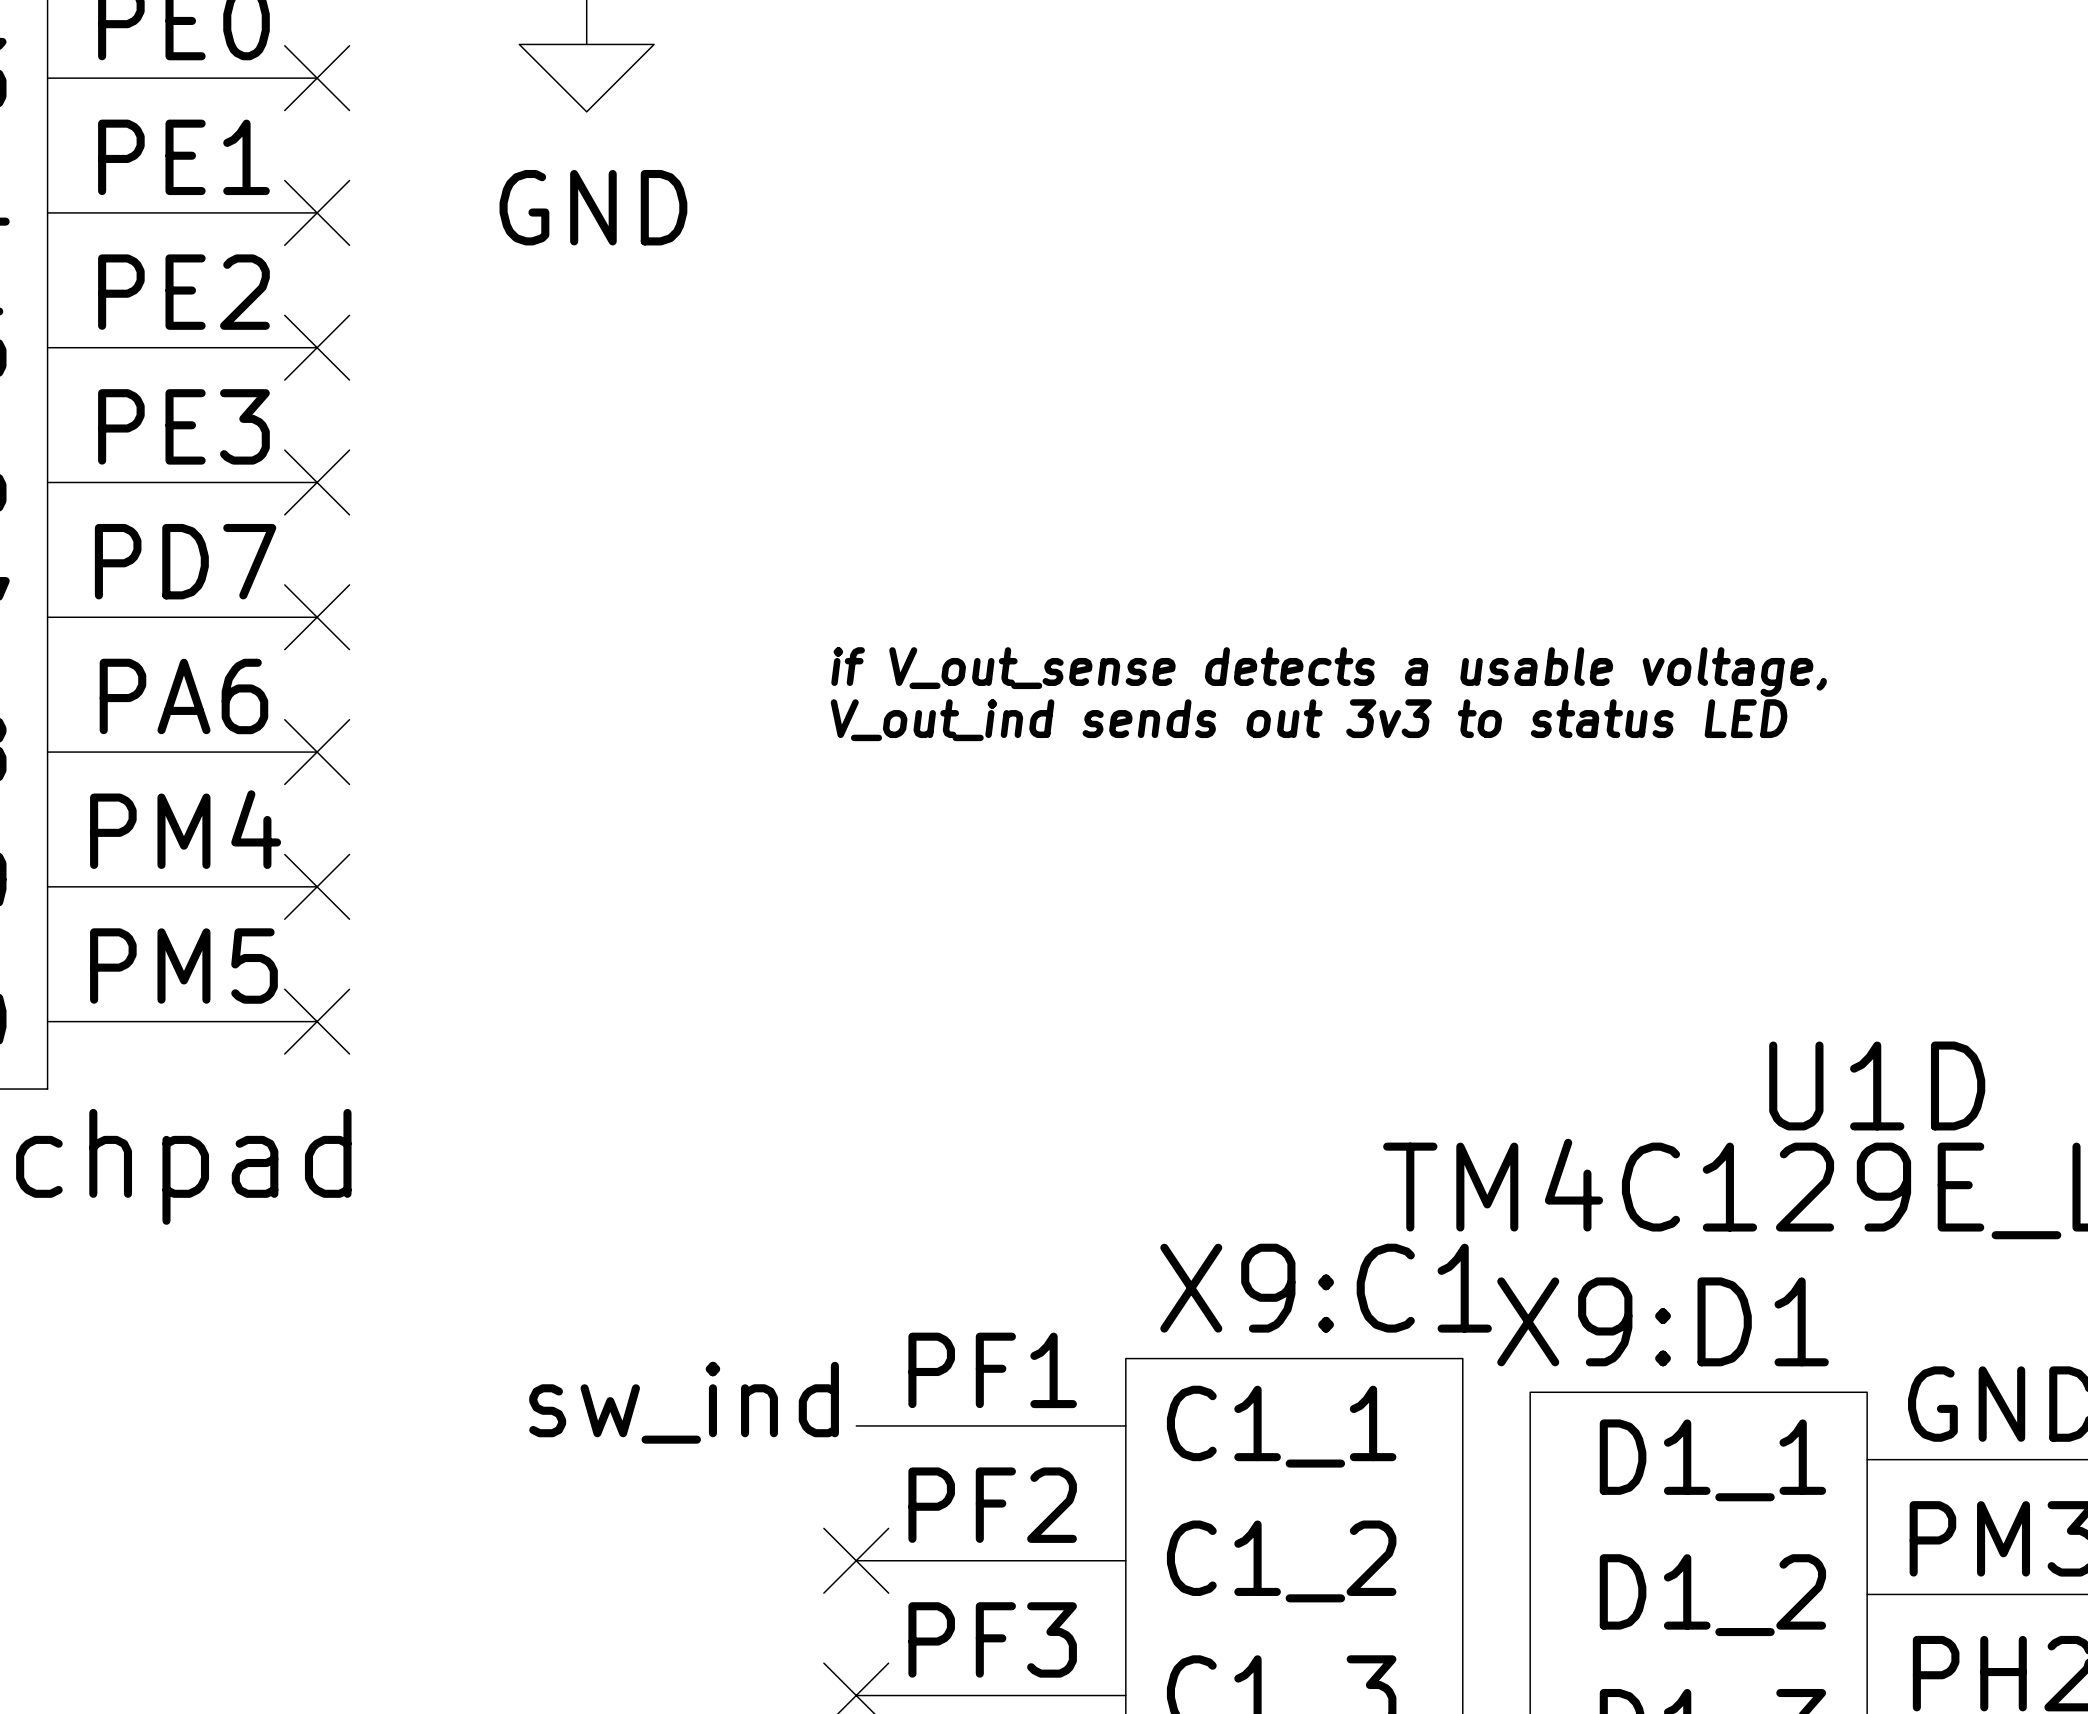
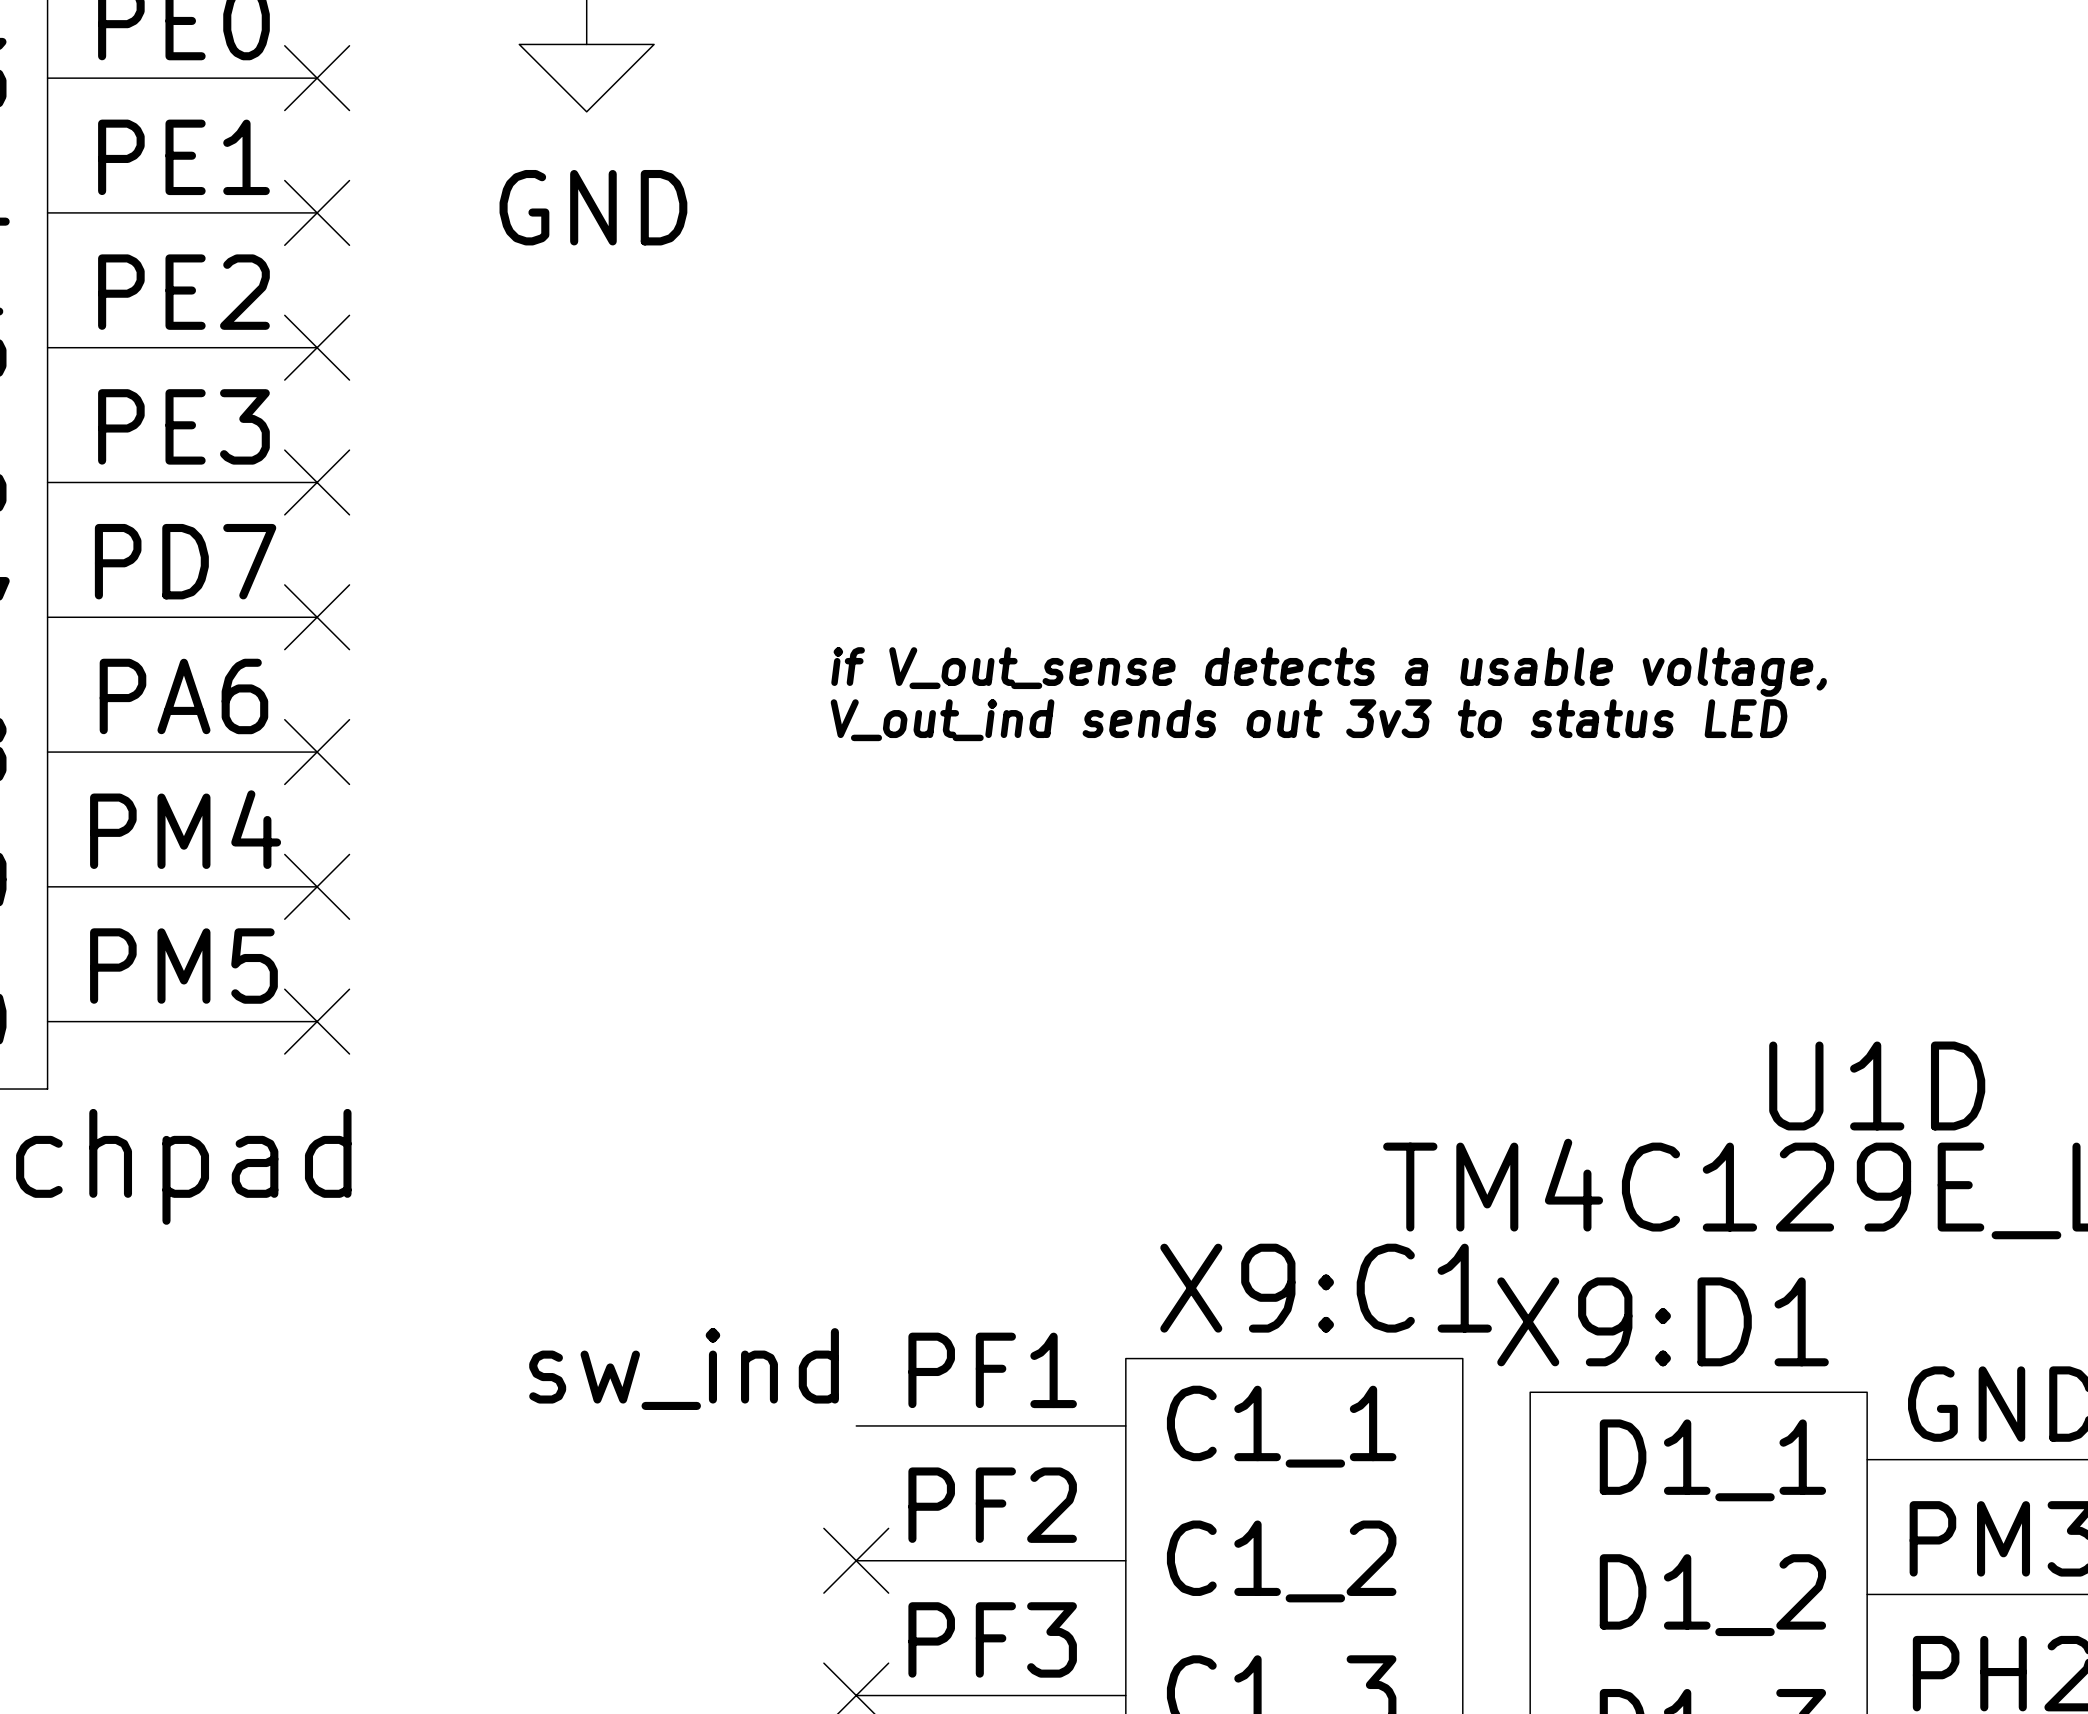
label position: sw_ind (684, 1402) -> sw_ind (684, 1369)

